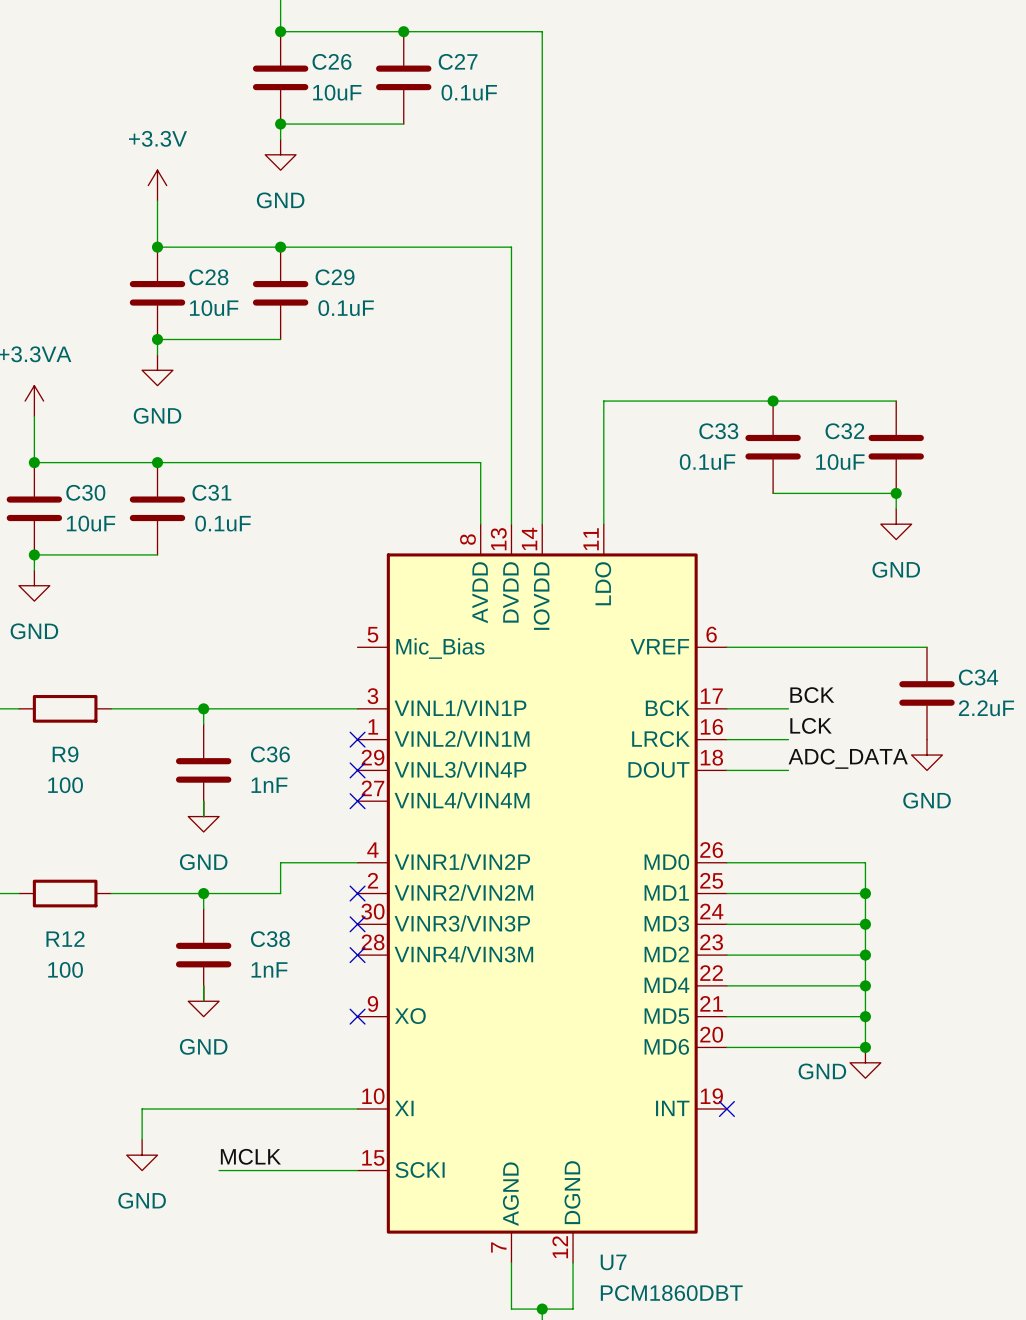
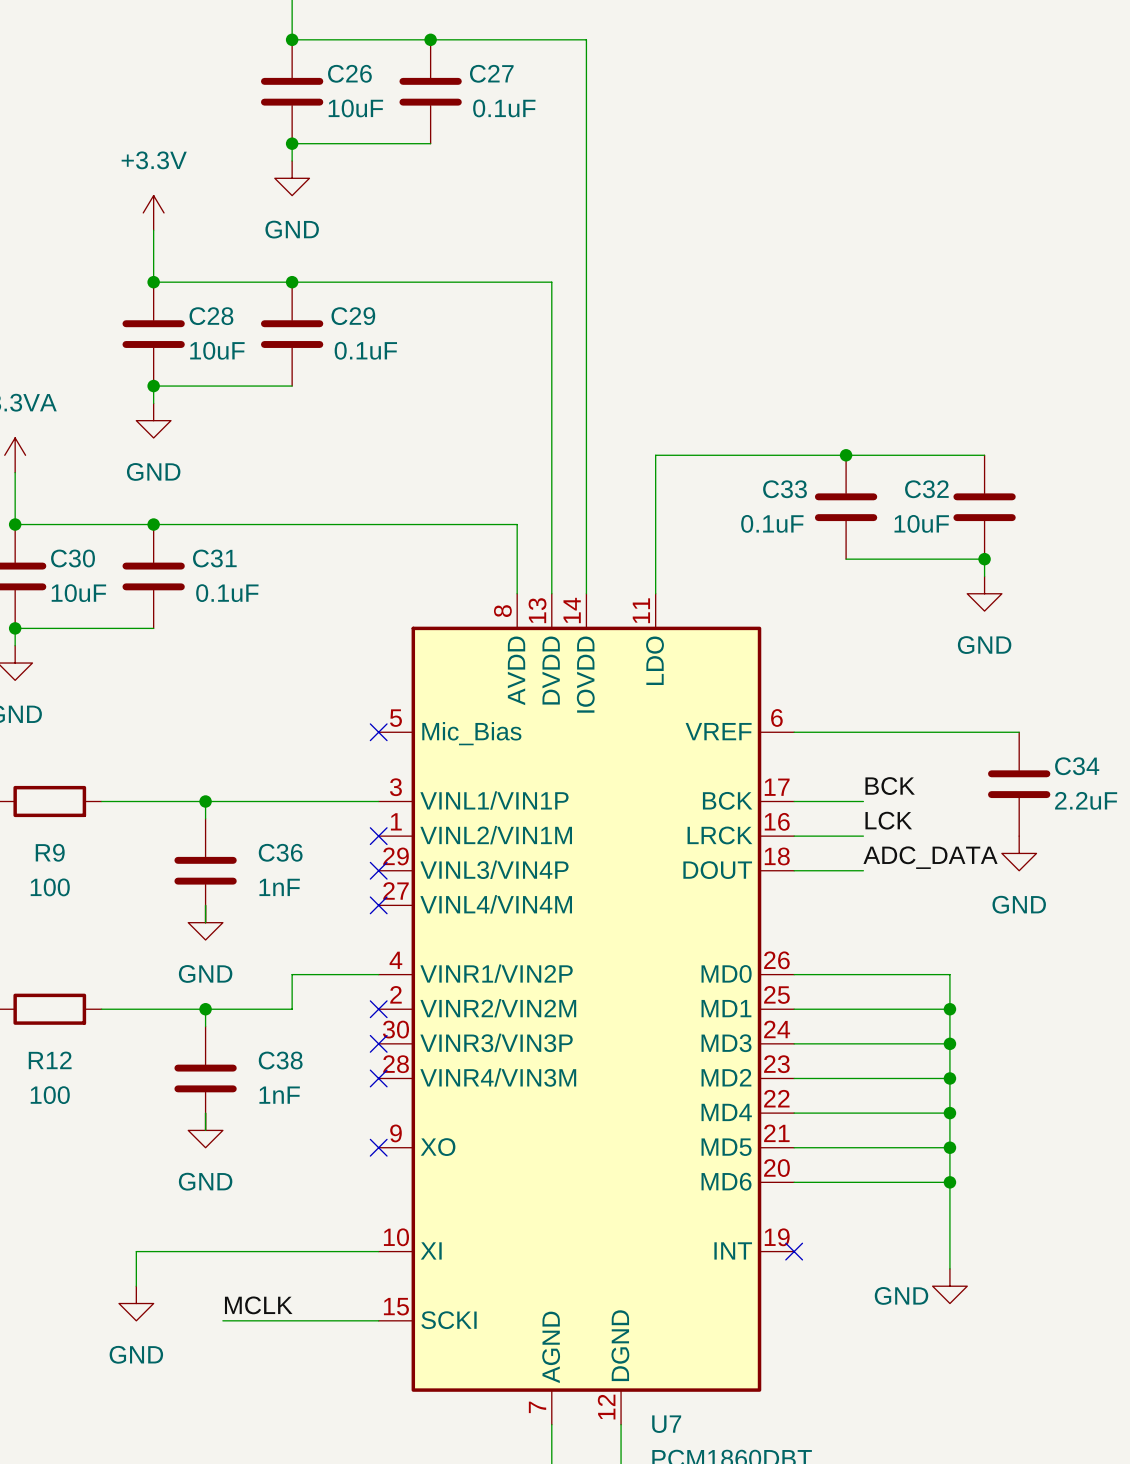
no-connect mark: none -> (378, 732)
wire: none -> (949, 1182) (949, 1268)
power symbol position: GND (865, 1062) -> GND (949, 1286)

